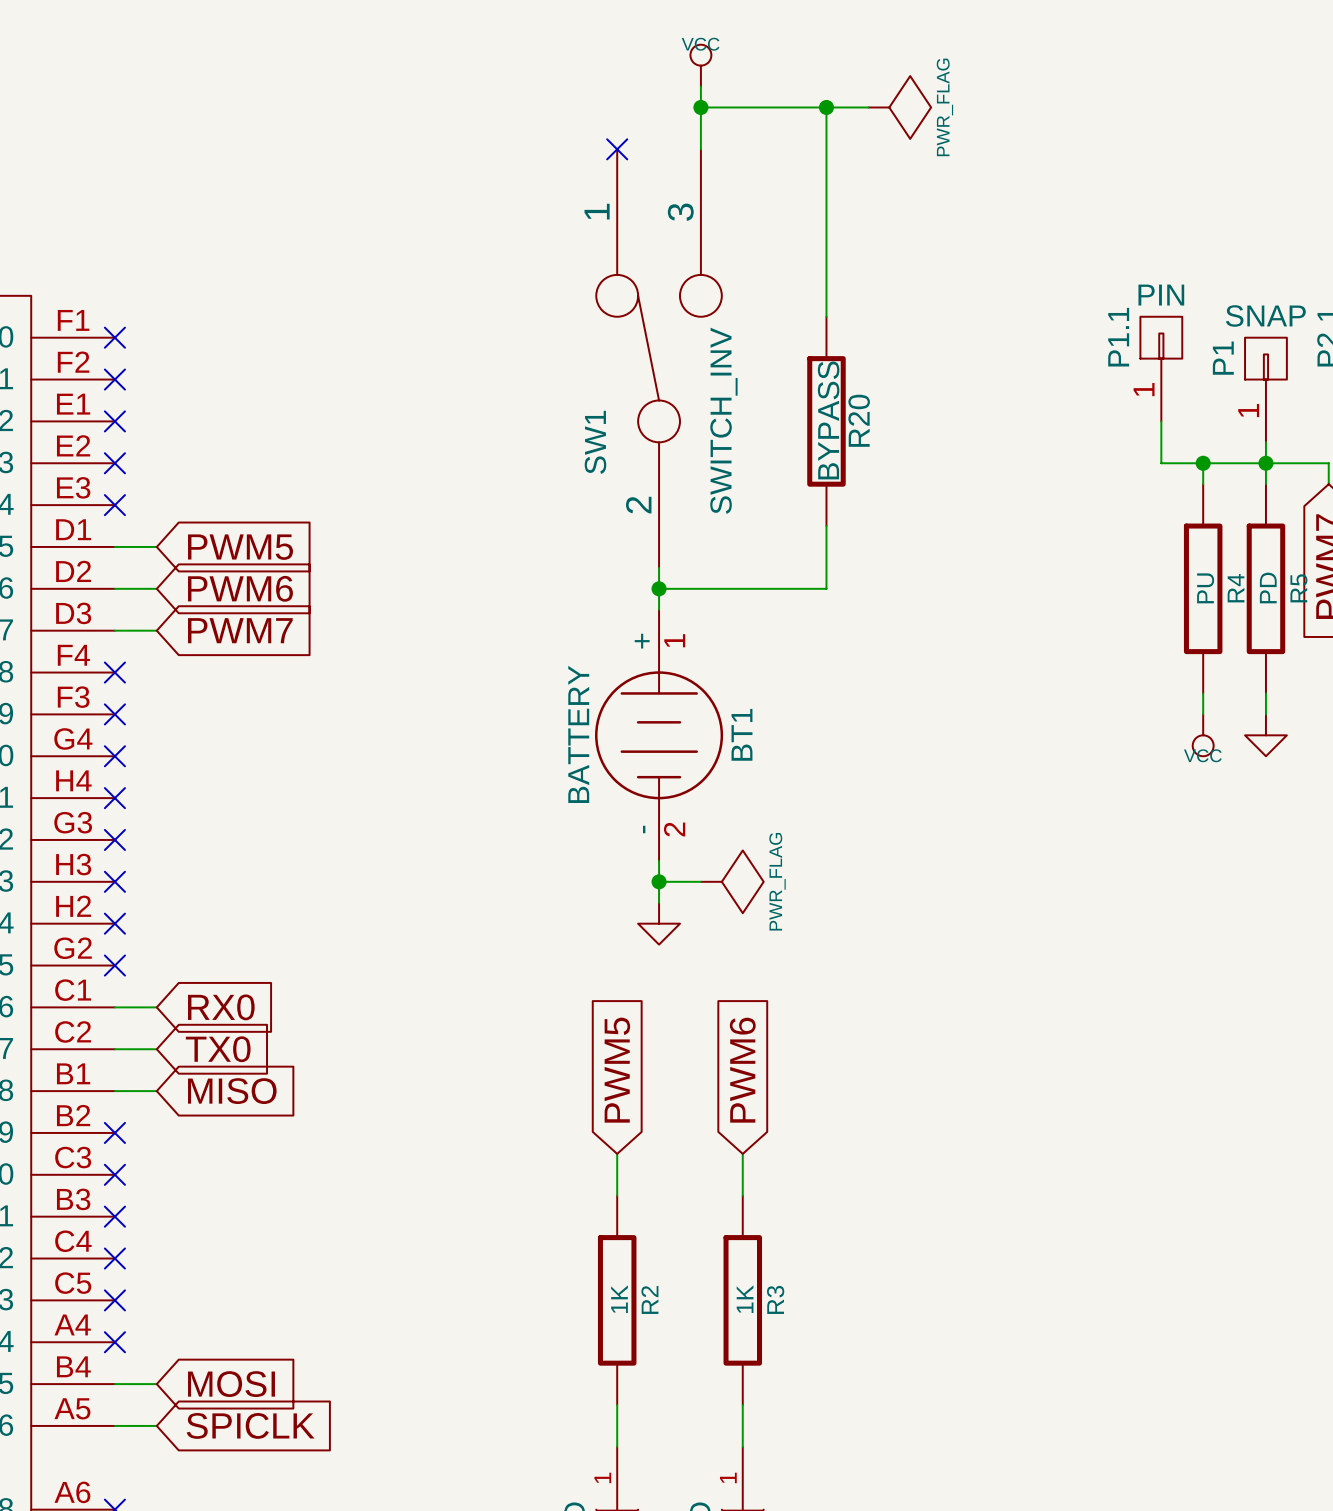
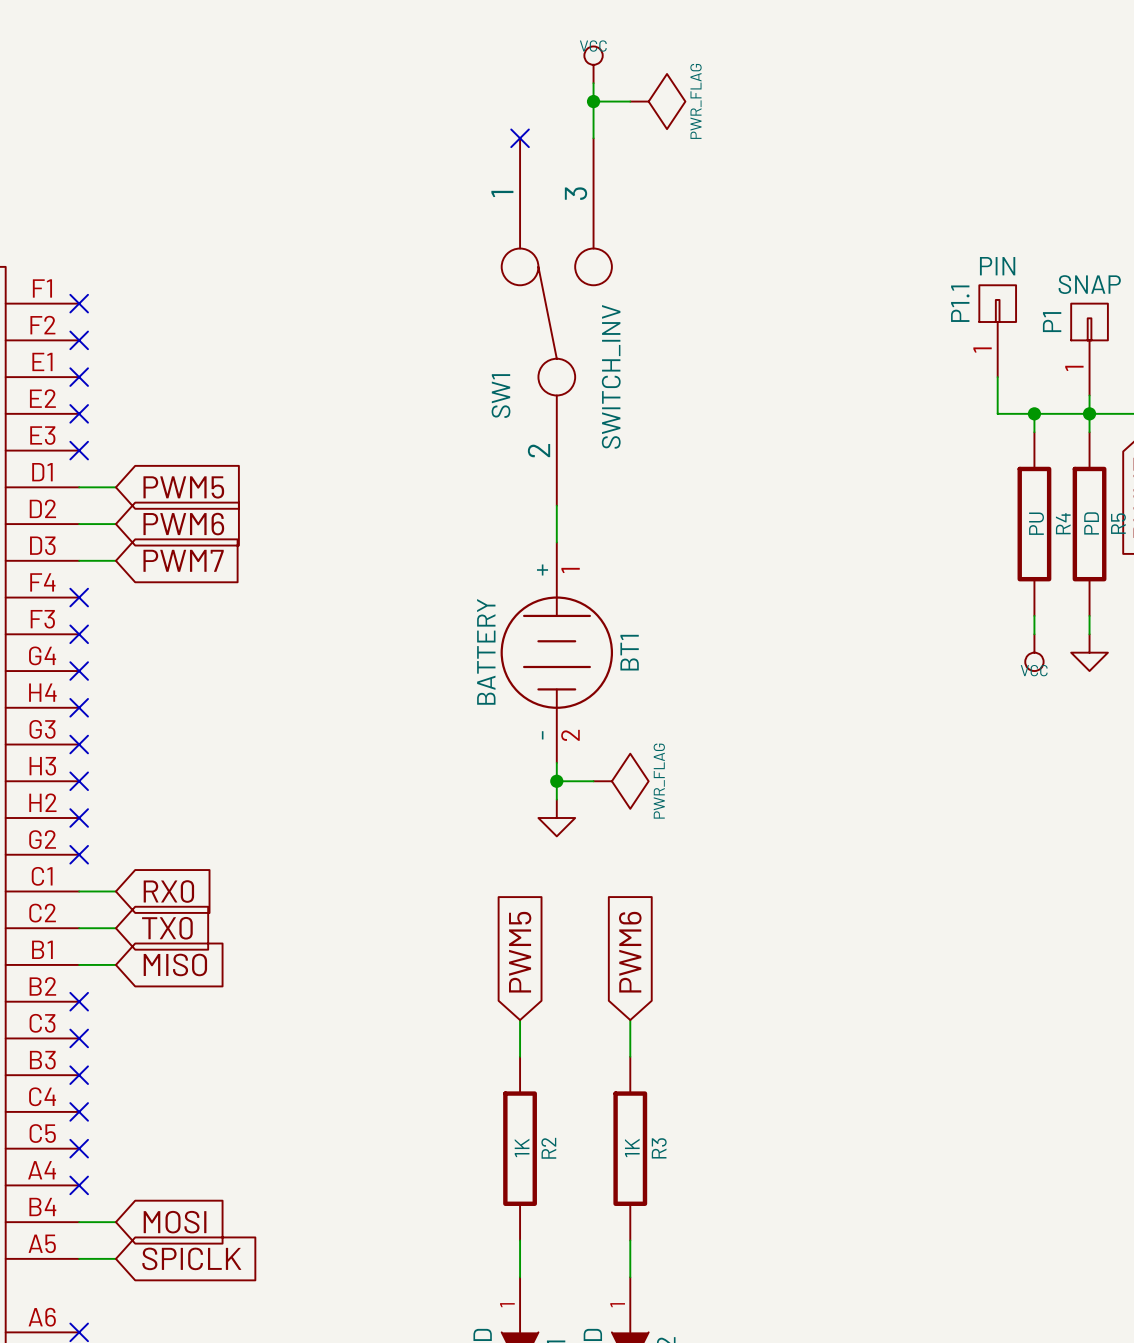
wire: (742, 107) (868, 107) -> none
wire: (826, 107) (826, 316) -> none
junction: (826, 107) -> none
power symbol position: PWR_FLAG (899, 107) -> PWR_FLAG (657, 101)
R20: BYPASS (826, 421) -> none
wire: (826, 526) (826, 588) (659, 588) -> none
junction: (659, 588) -> none

